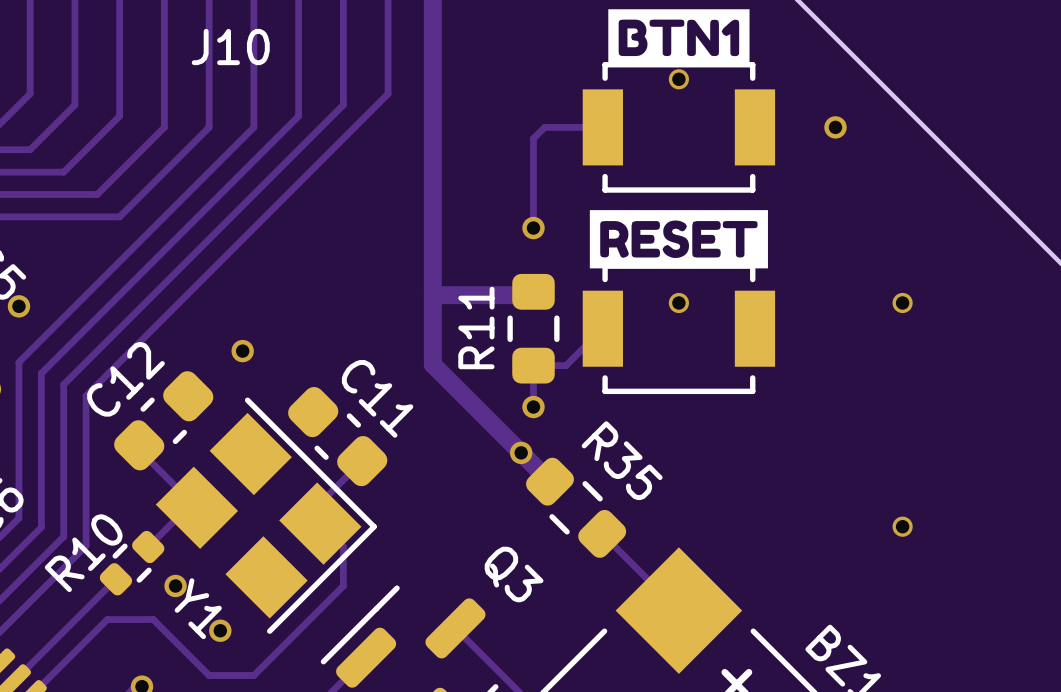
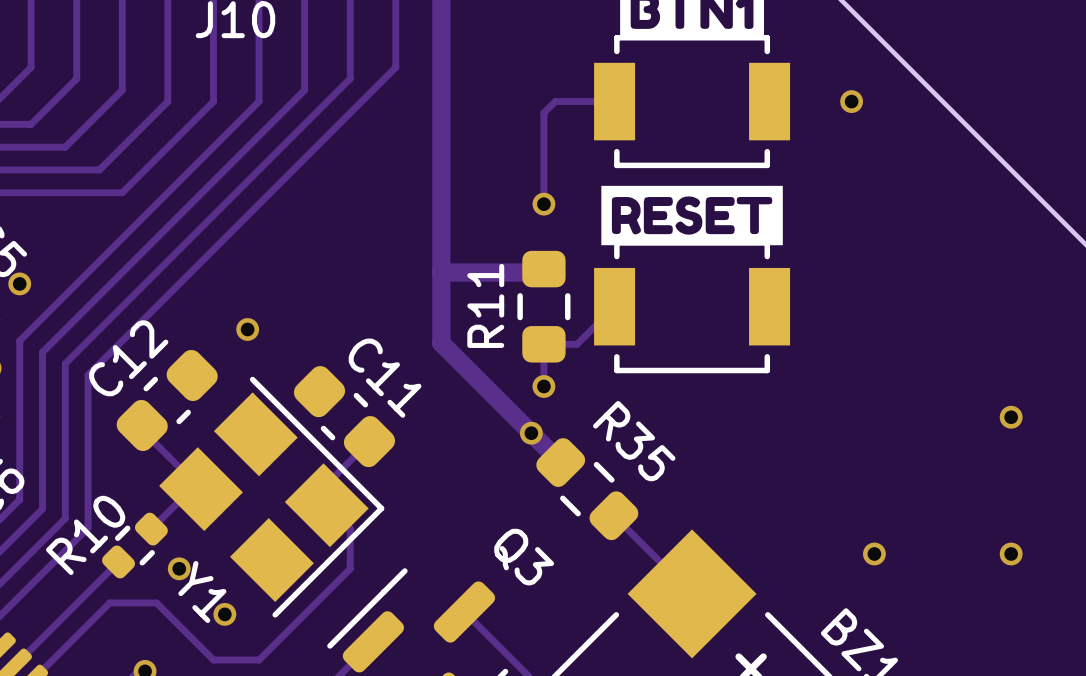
via: (678, 79) -> none
via: (678, 303) -> none
via: (902, 303) -> none
via: none -> (1011, 417)
via: (902, 526) -> none
via: none -> (874, 553)
via: none -> (1011, 553)

